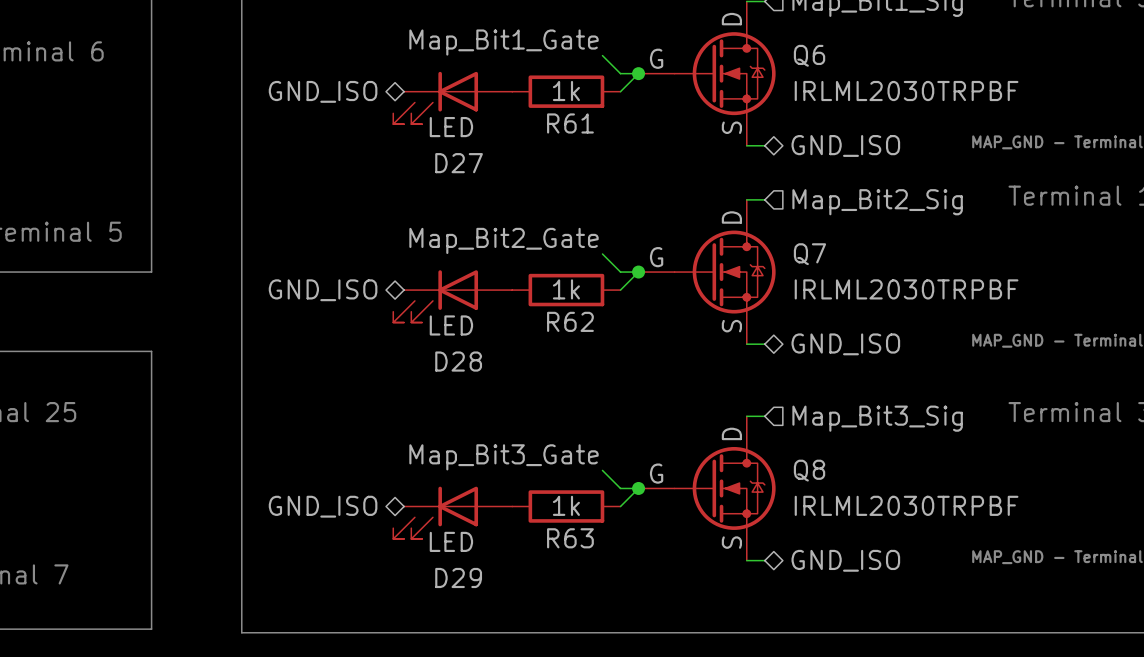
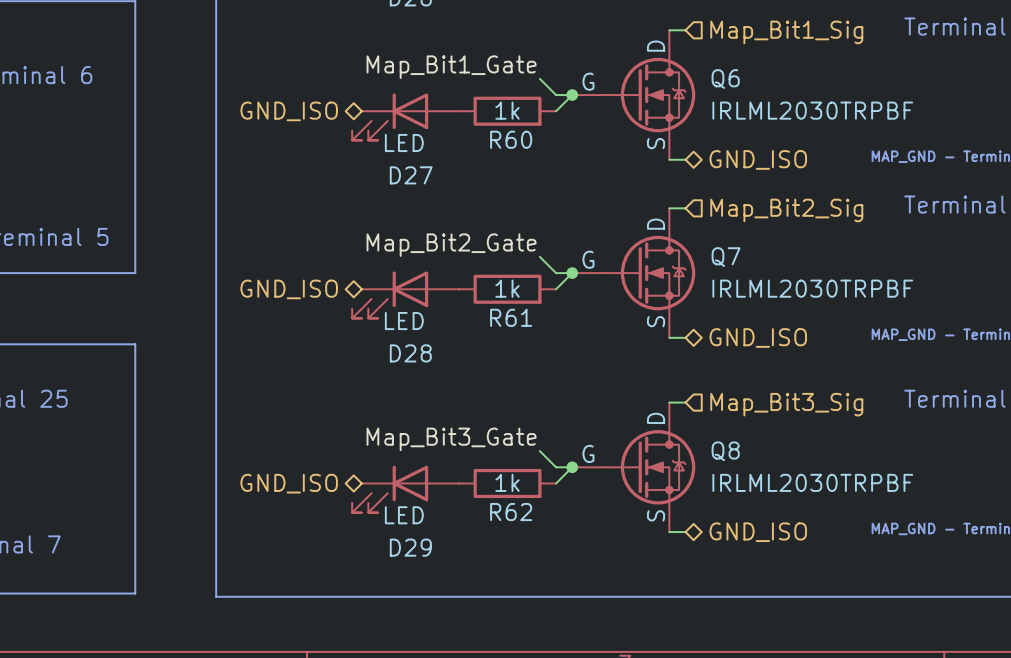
R61 name: R61 (570, 123) -> R60 (511, 139)
R62 name: R62 (570, 321) -> R61 (511, 317)
R63 name: R63 (570, 538) -> R62 (511, 512)

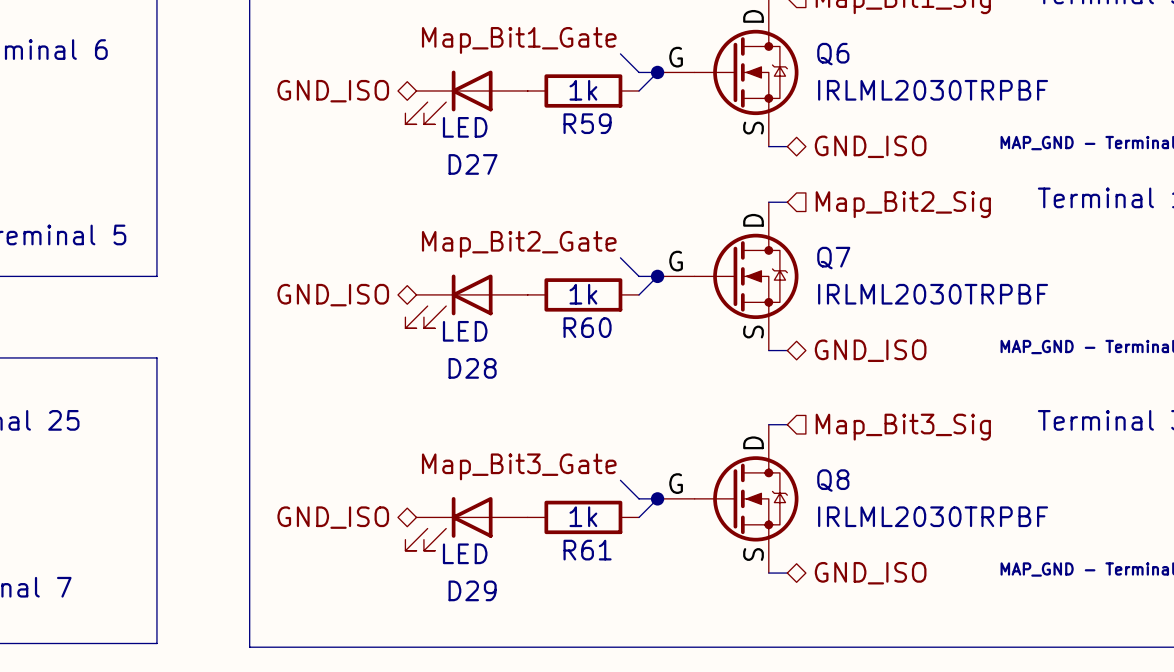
R60 name: R60 (511, 139) -> R59 (587, 123)
R61 name: R61 (511, 317) -> R60 (587, 327)
R62 name: R62 (511, 512) -> R61 (587, 550)

